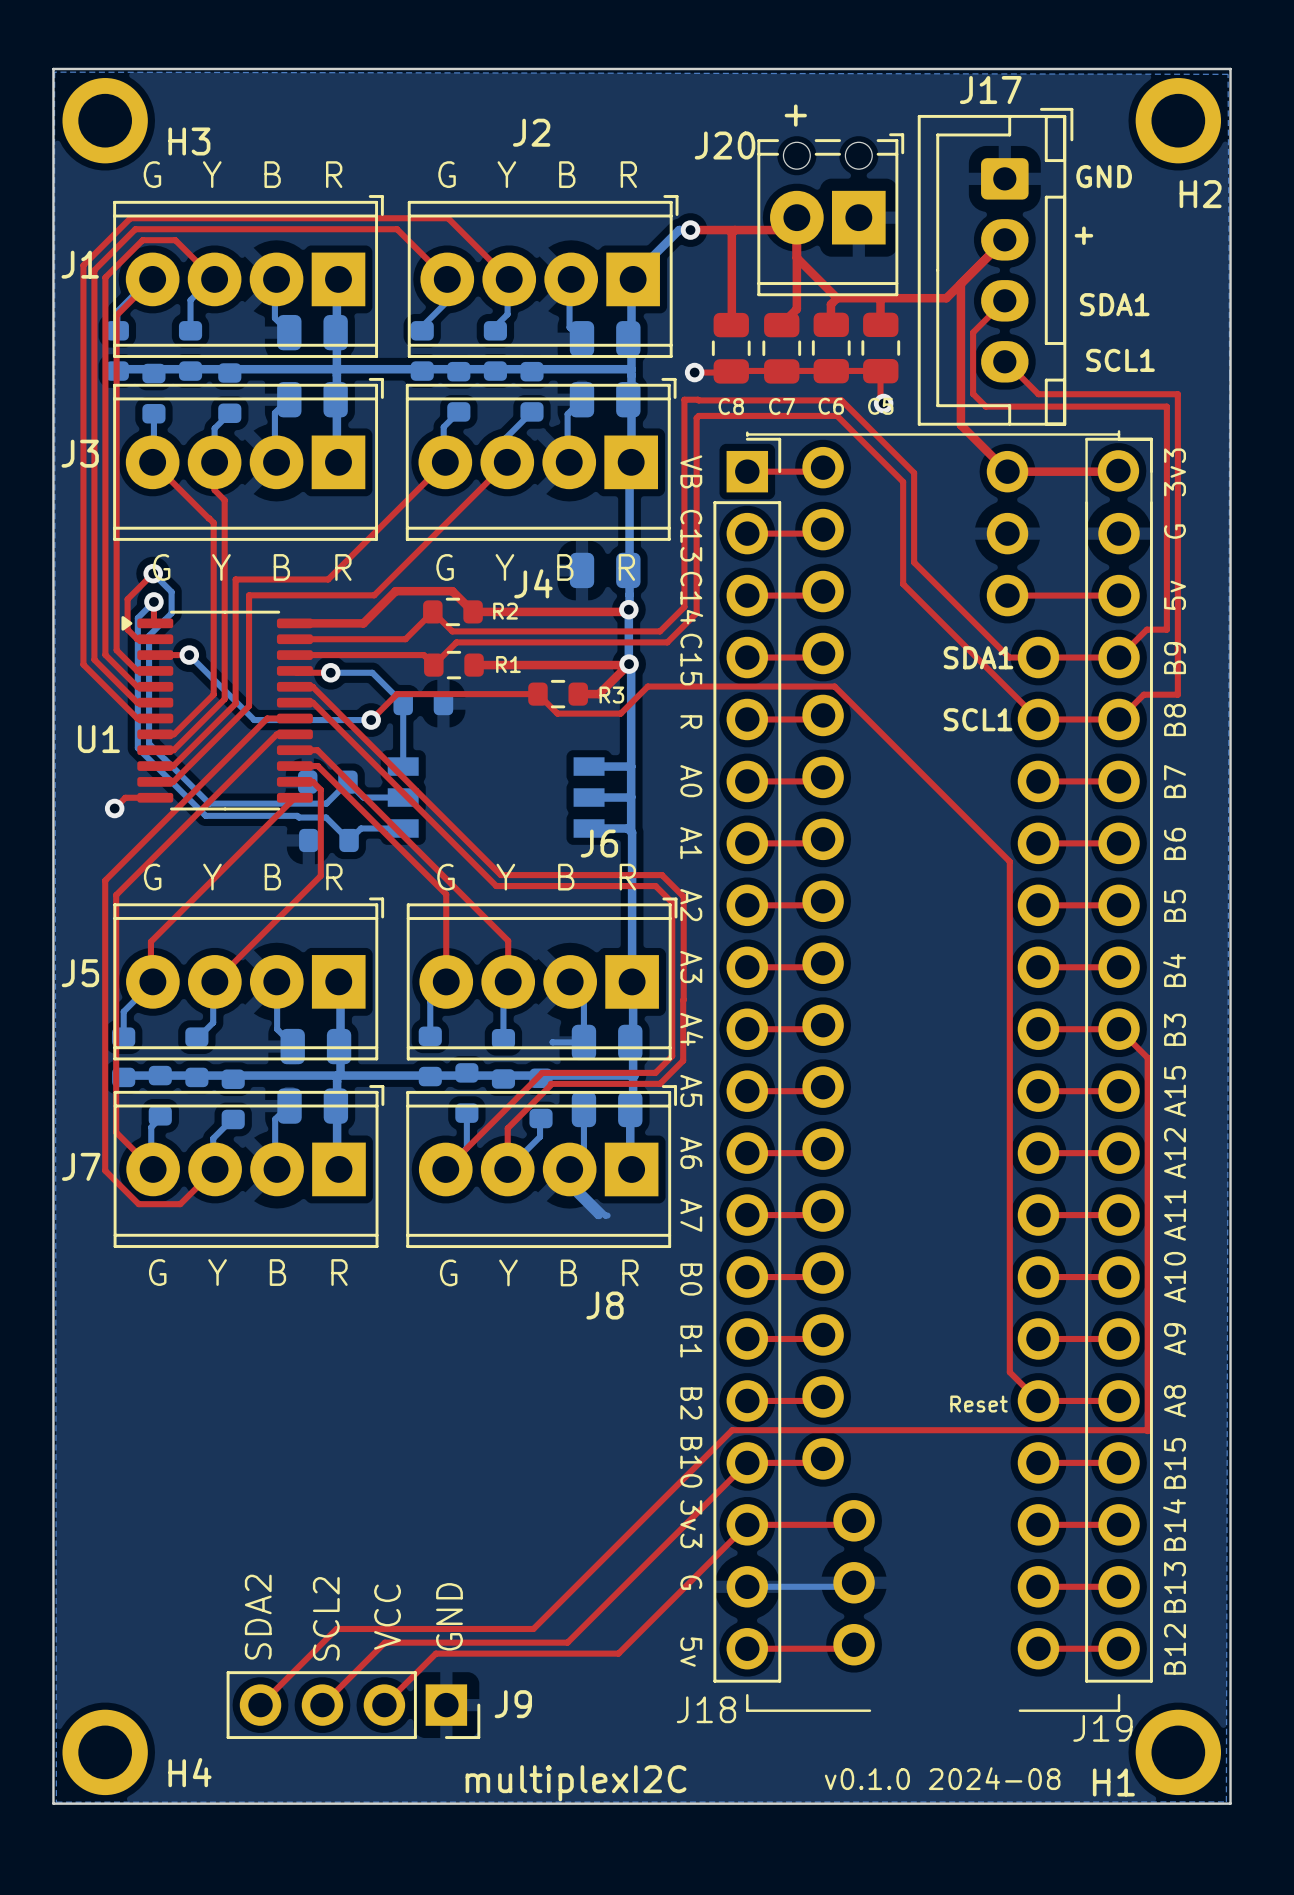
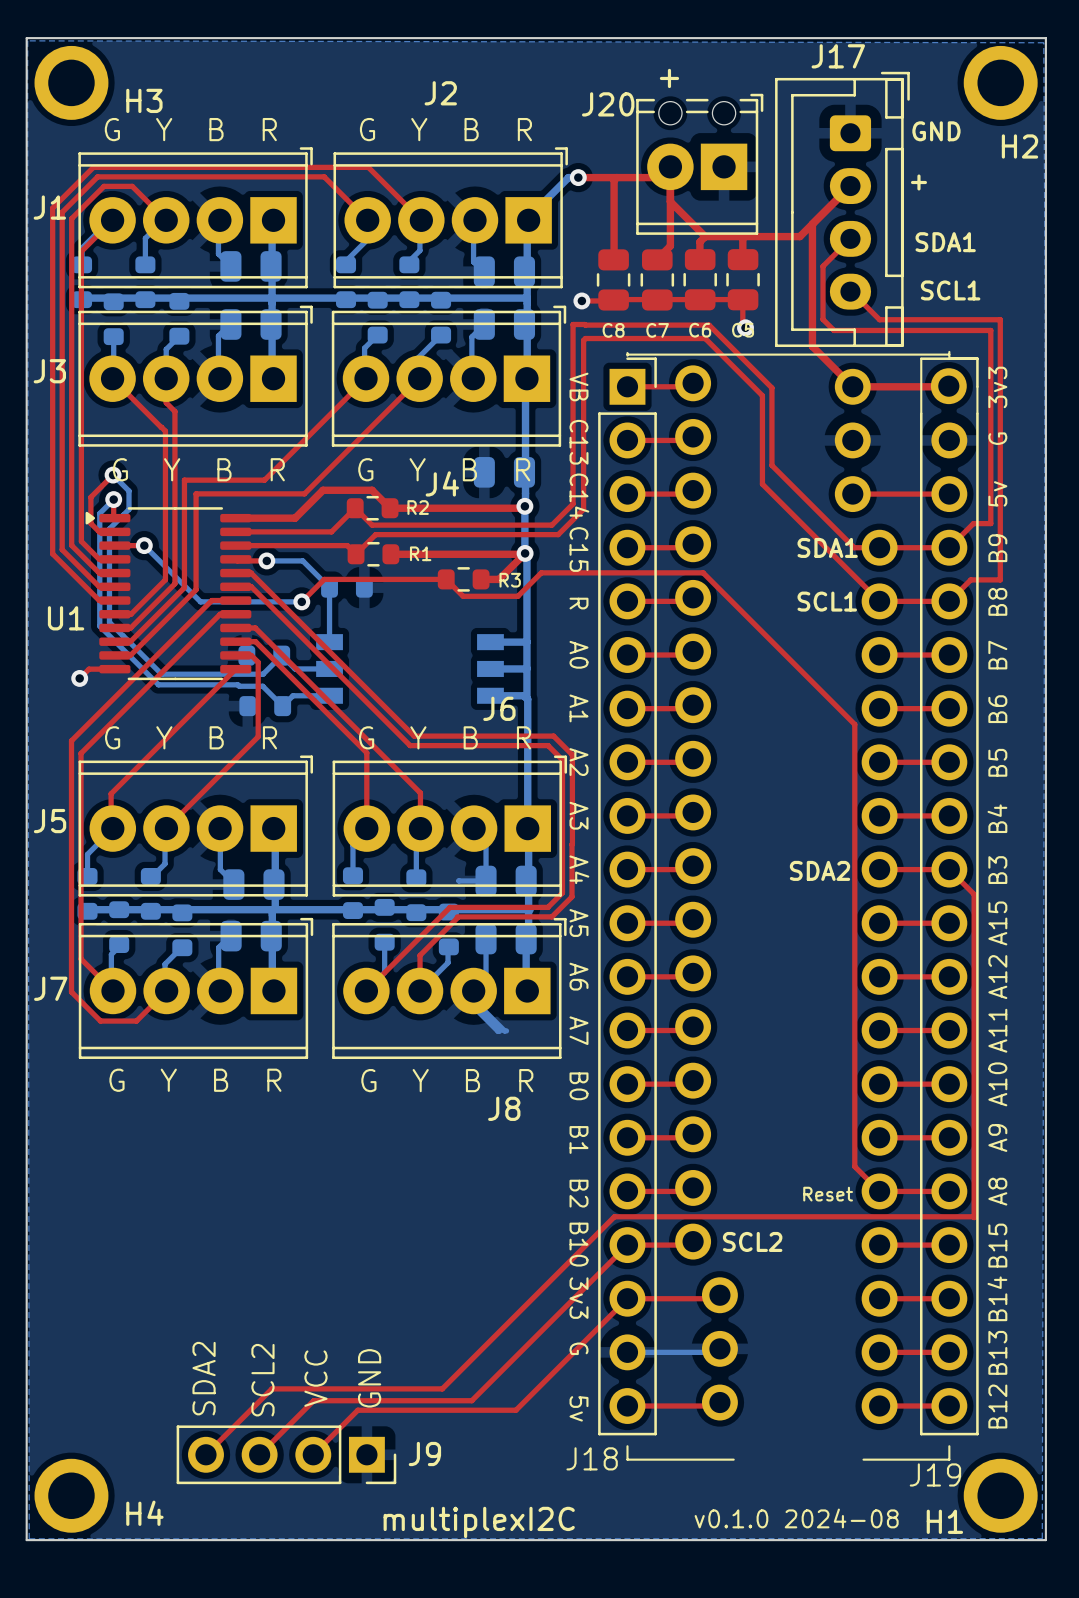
text: none -> SDA2 (820, 870)
text: none -> SCL2 (752, 1241)

